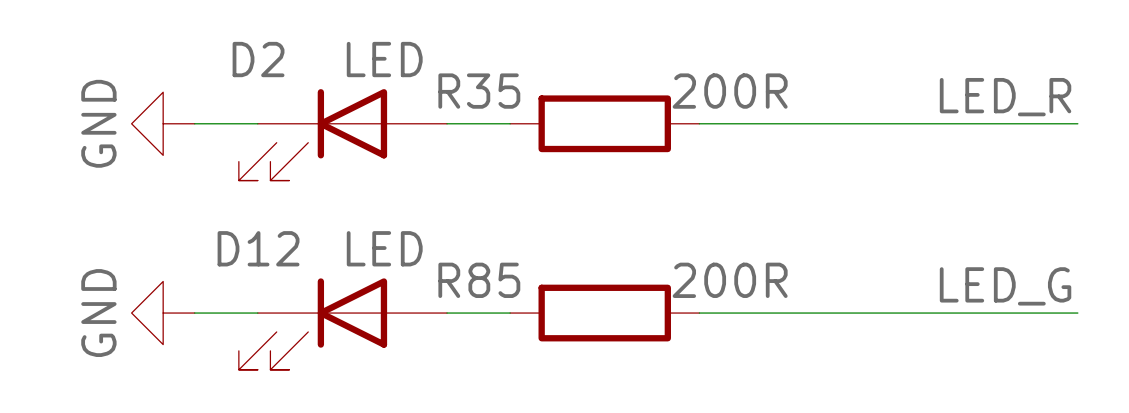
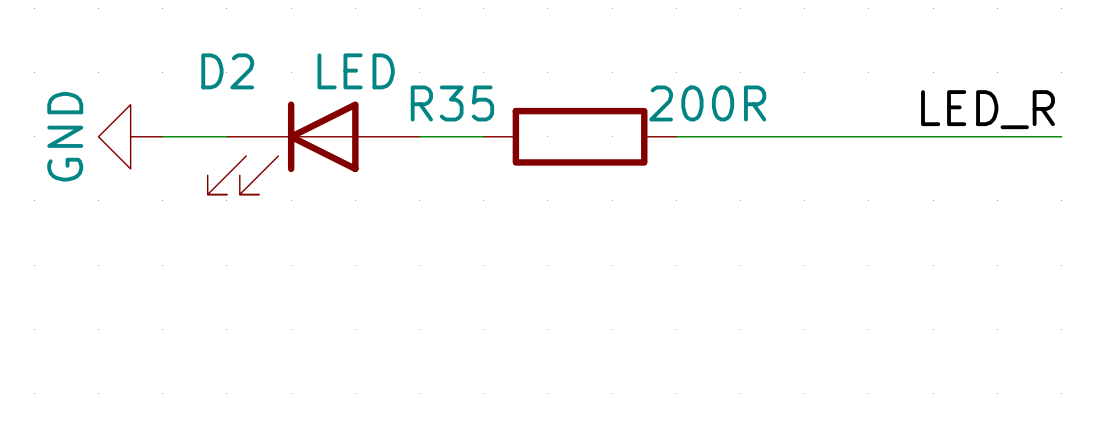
label: LED_G (1005, 286) -> none
power symbol: GND (163, 313) -> none
wire: (194, 313) (257, 313) -> none
wire: (447, 313) (510, 313) -> none
R85: 200R (604, 313) -> none
wire: (699, 313) (1077, 313) -> none
D12: LED (342, 324) -> none

